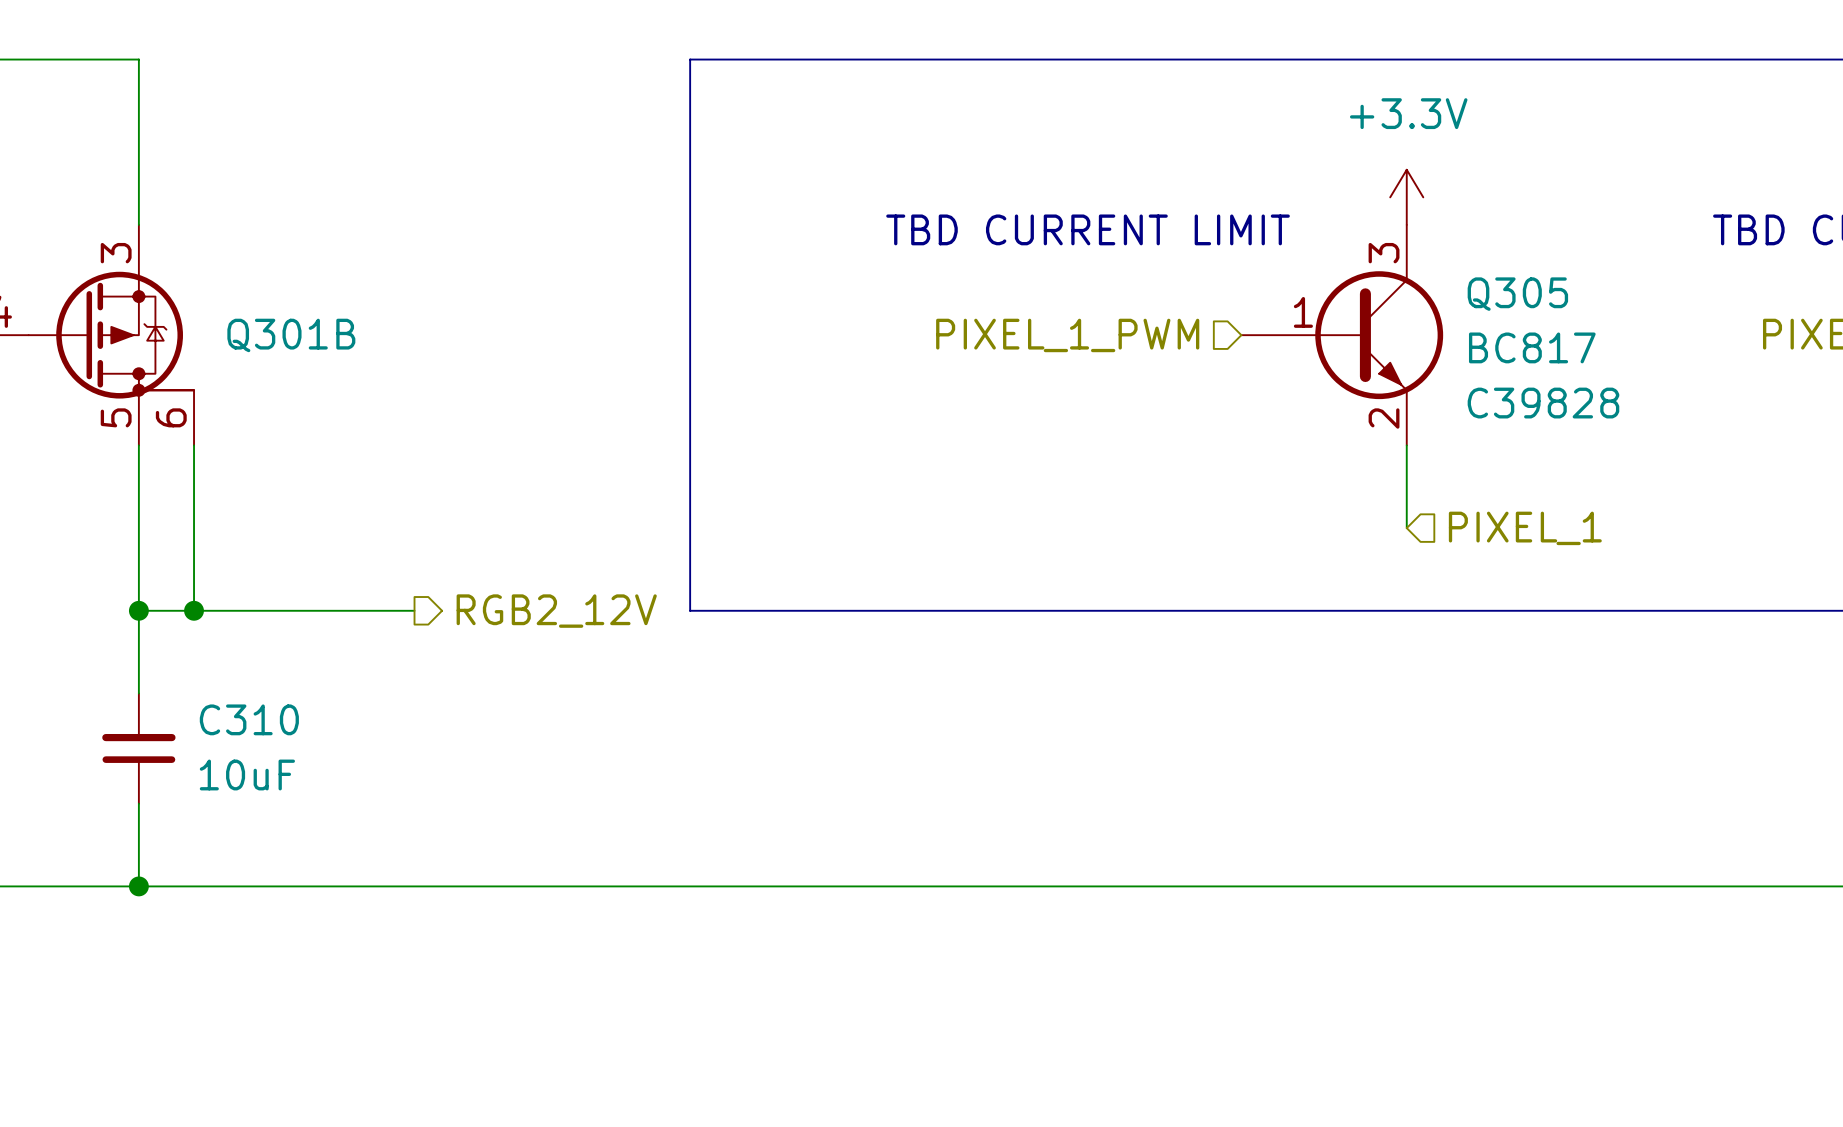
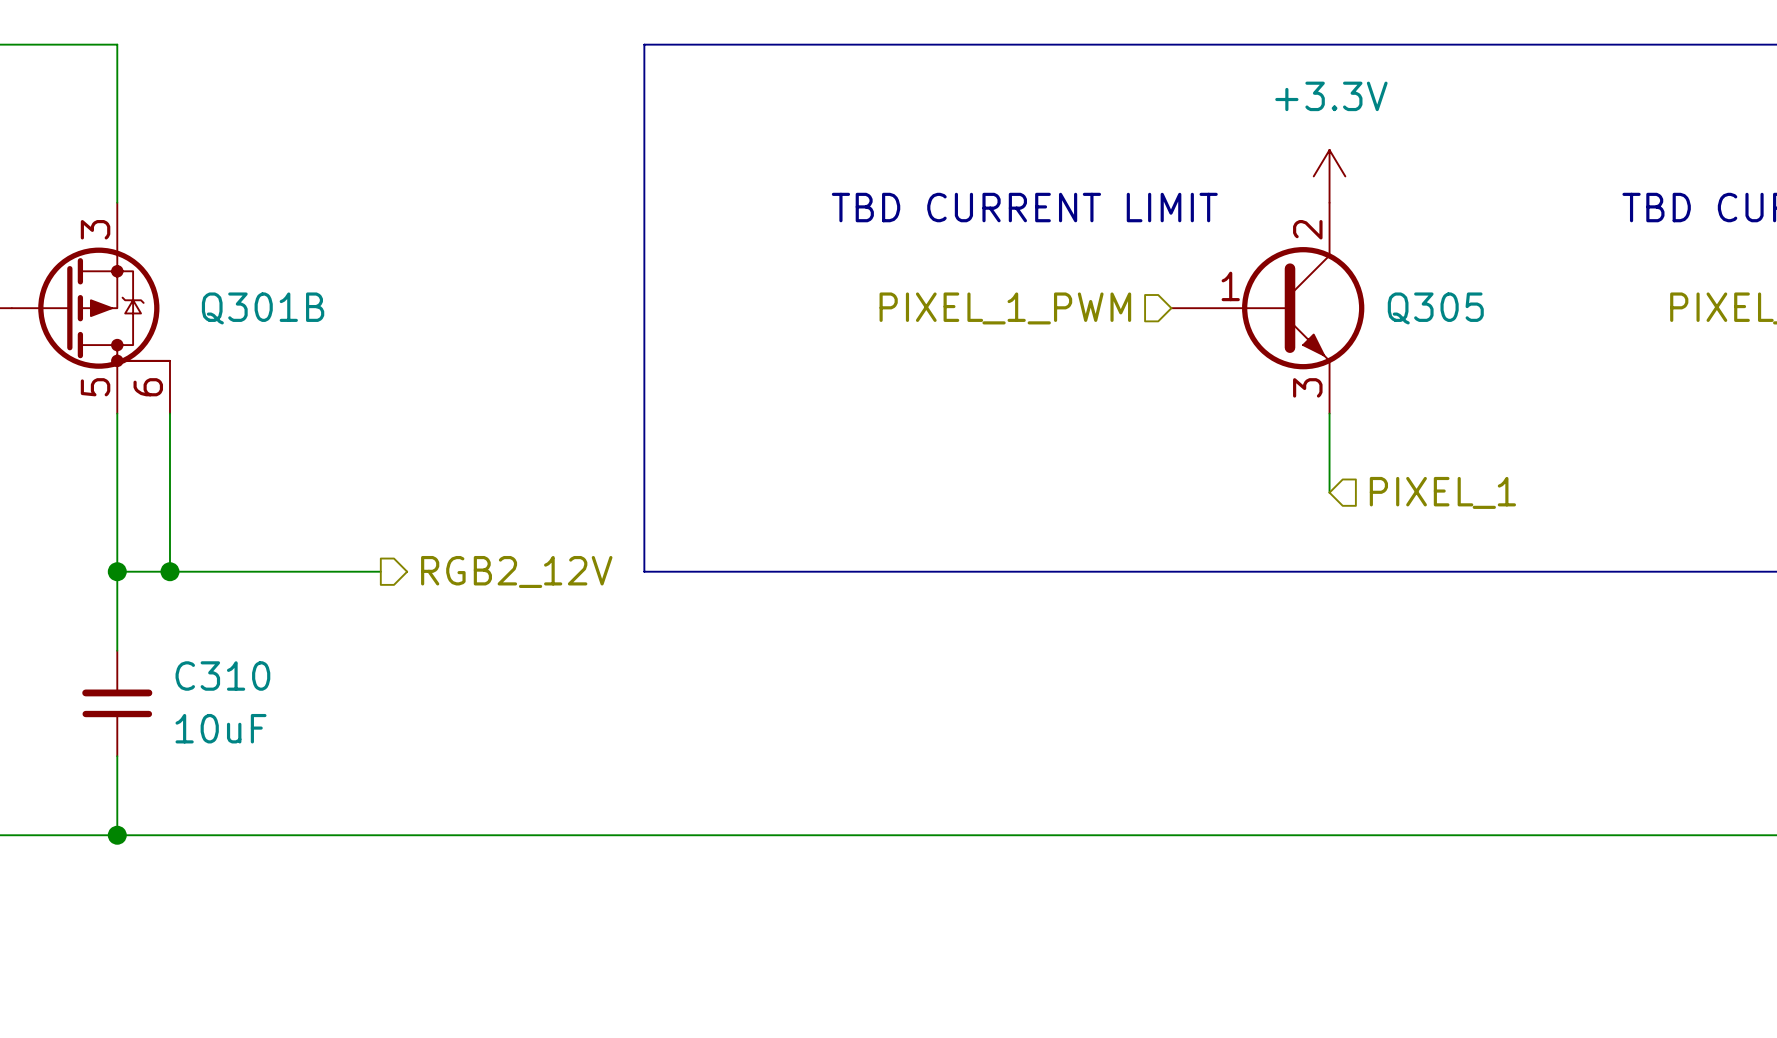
Q305 pin number: 3 (1384, 253) -> 2 (1307, 229)
Q305 name position: Q305 (1517, 294) -> Q305 (1435, 308)
Q305 value: BC817 (1532, 347) -> none
Q305 text: C39828 (1543, 403) -> none
Q305 pin number: 2 (1384, 418) -> 3 (1307, 387)

